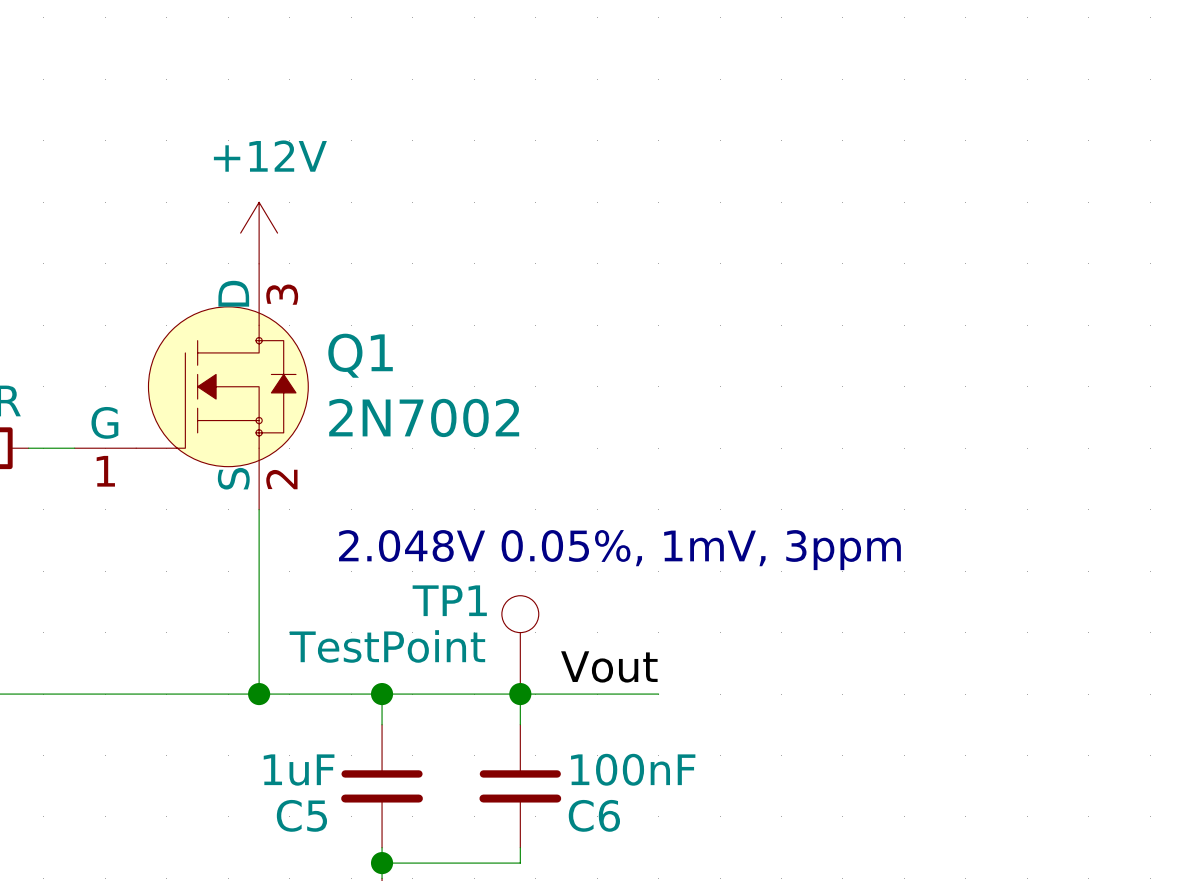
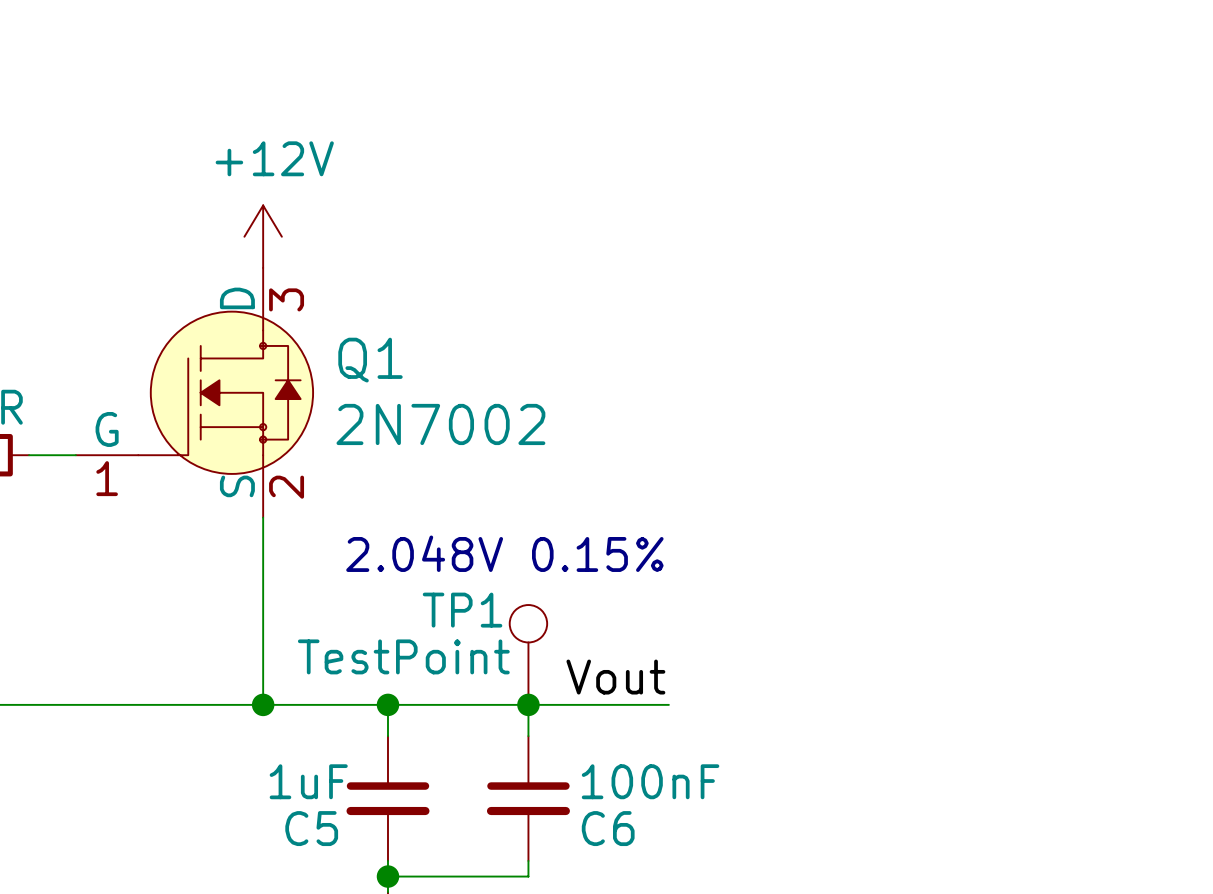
text: 2.048V 0.05%, 1mV, 3ppm (619, 550) -> 2.048V 0.15% (504, 553)

